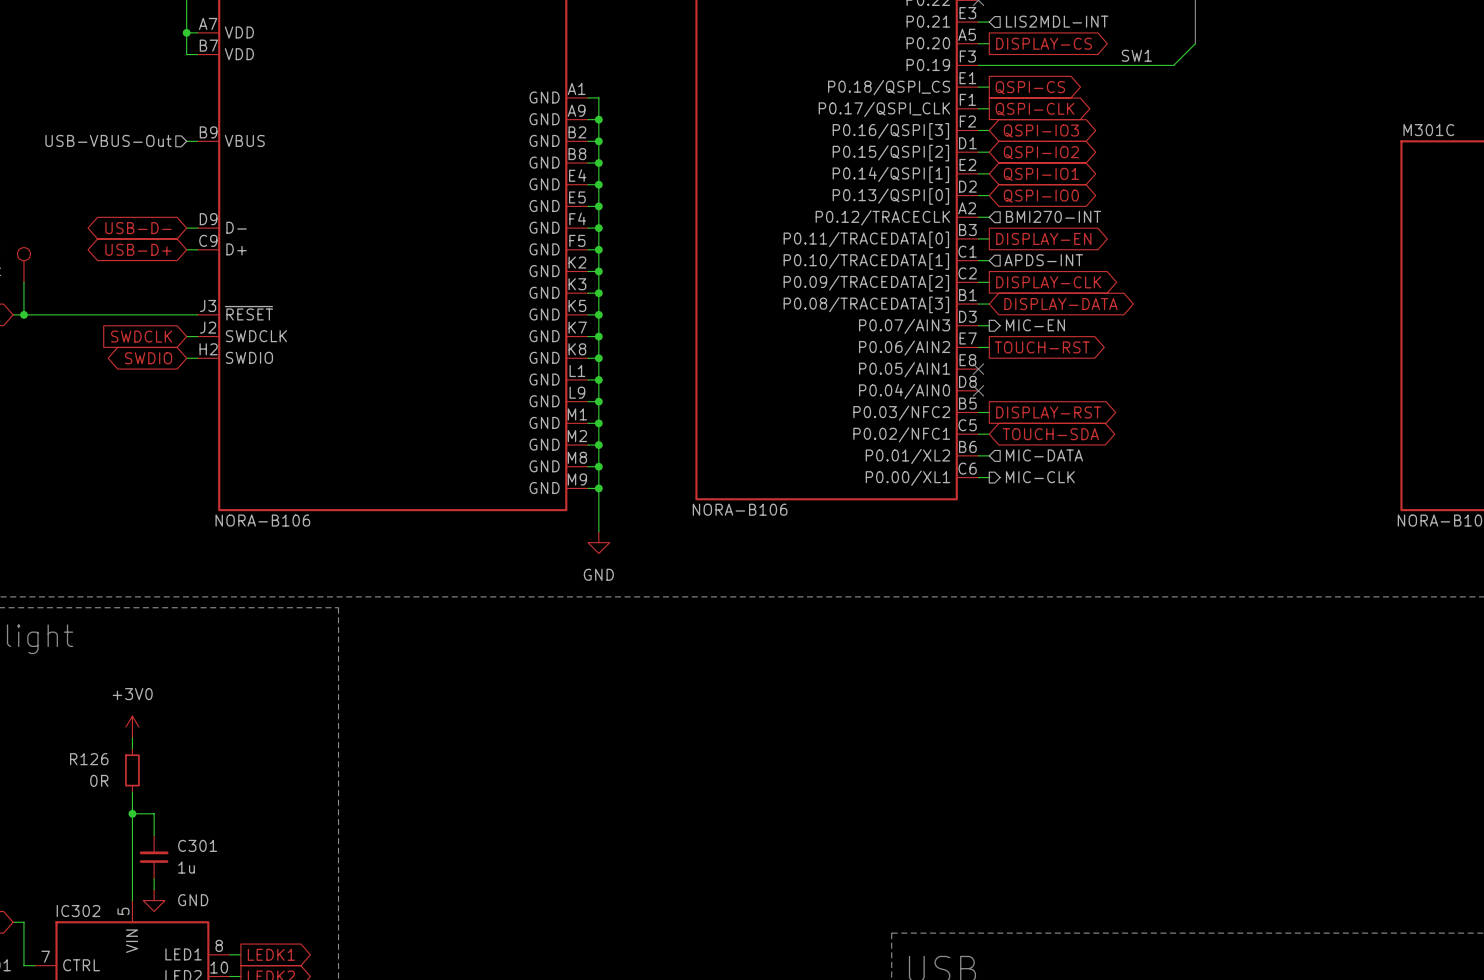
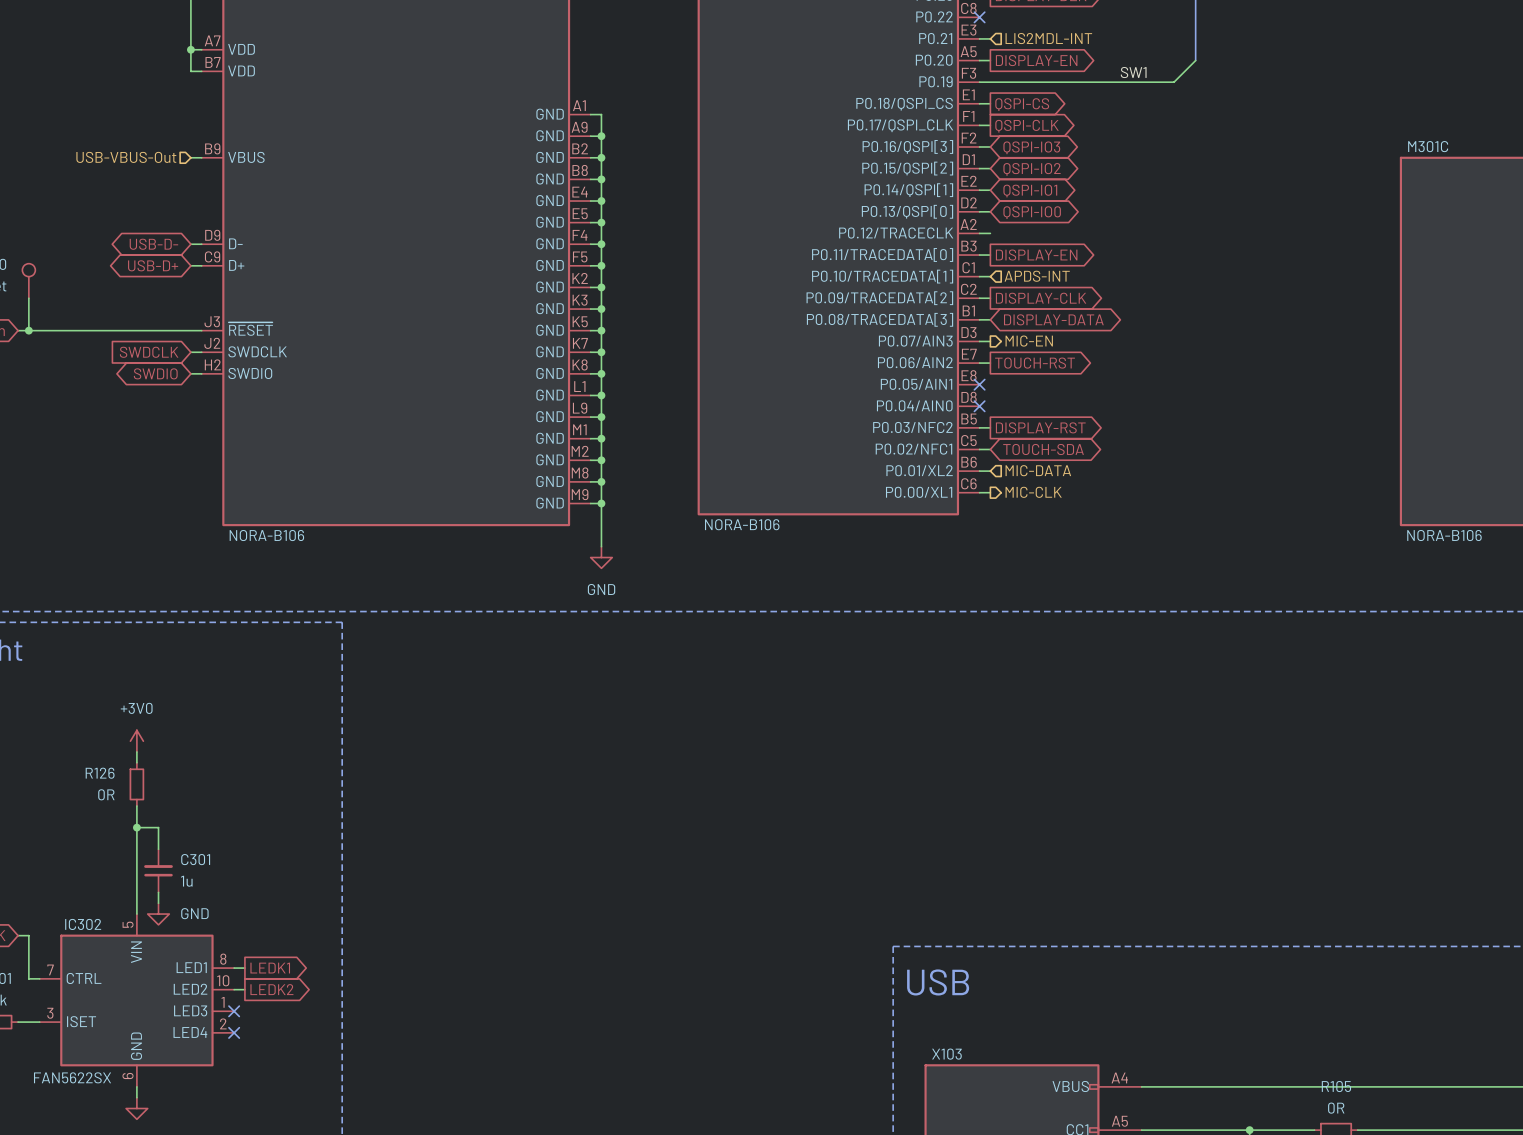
global label: DISPLAY-CS (1044, 43) -> DISPLAY-EN (1036, 60)
hierarchical label: BMI270-INT (1053, 216) -> none

